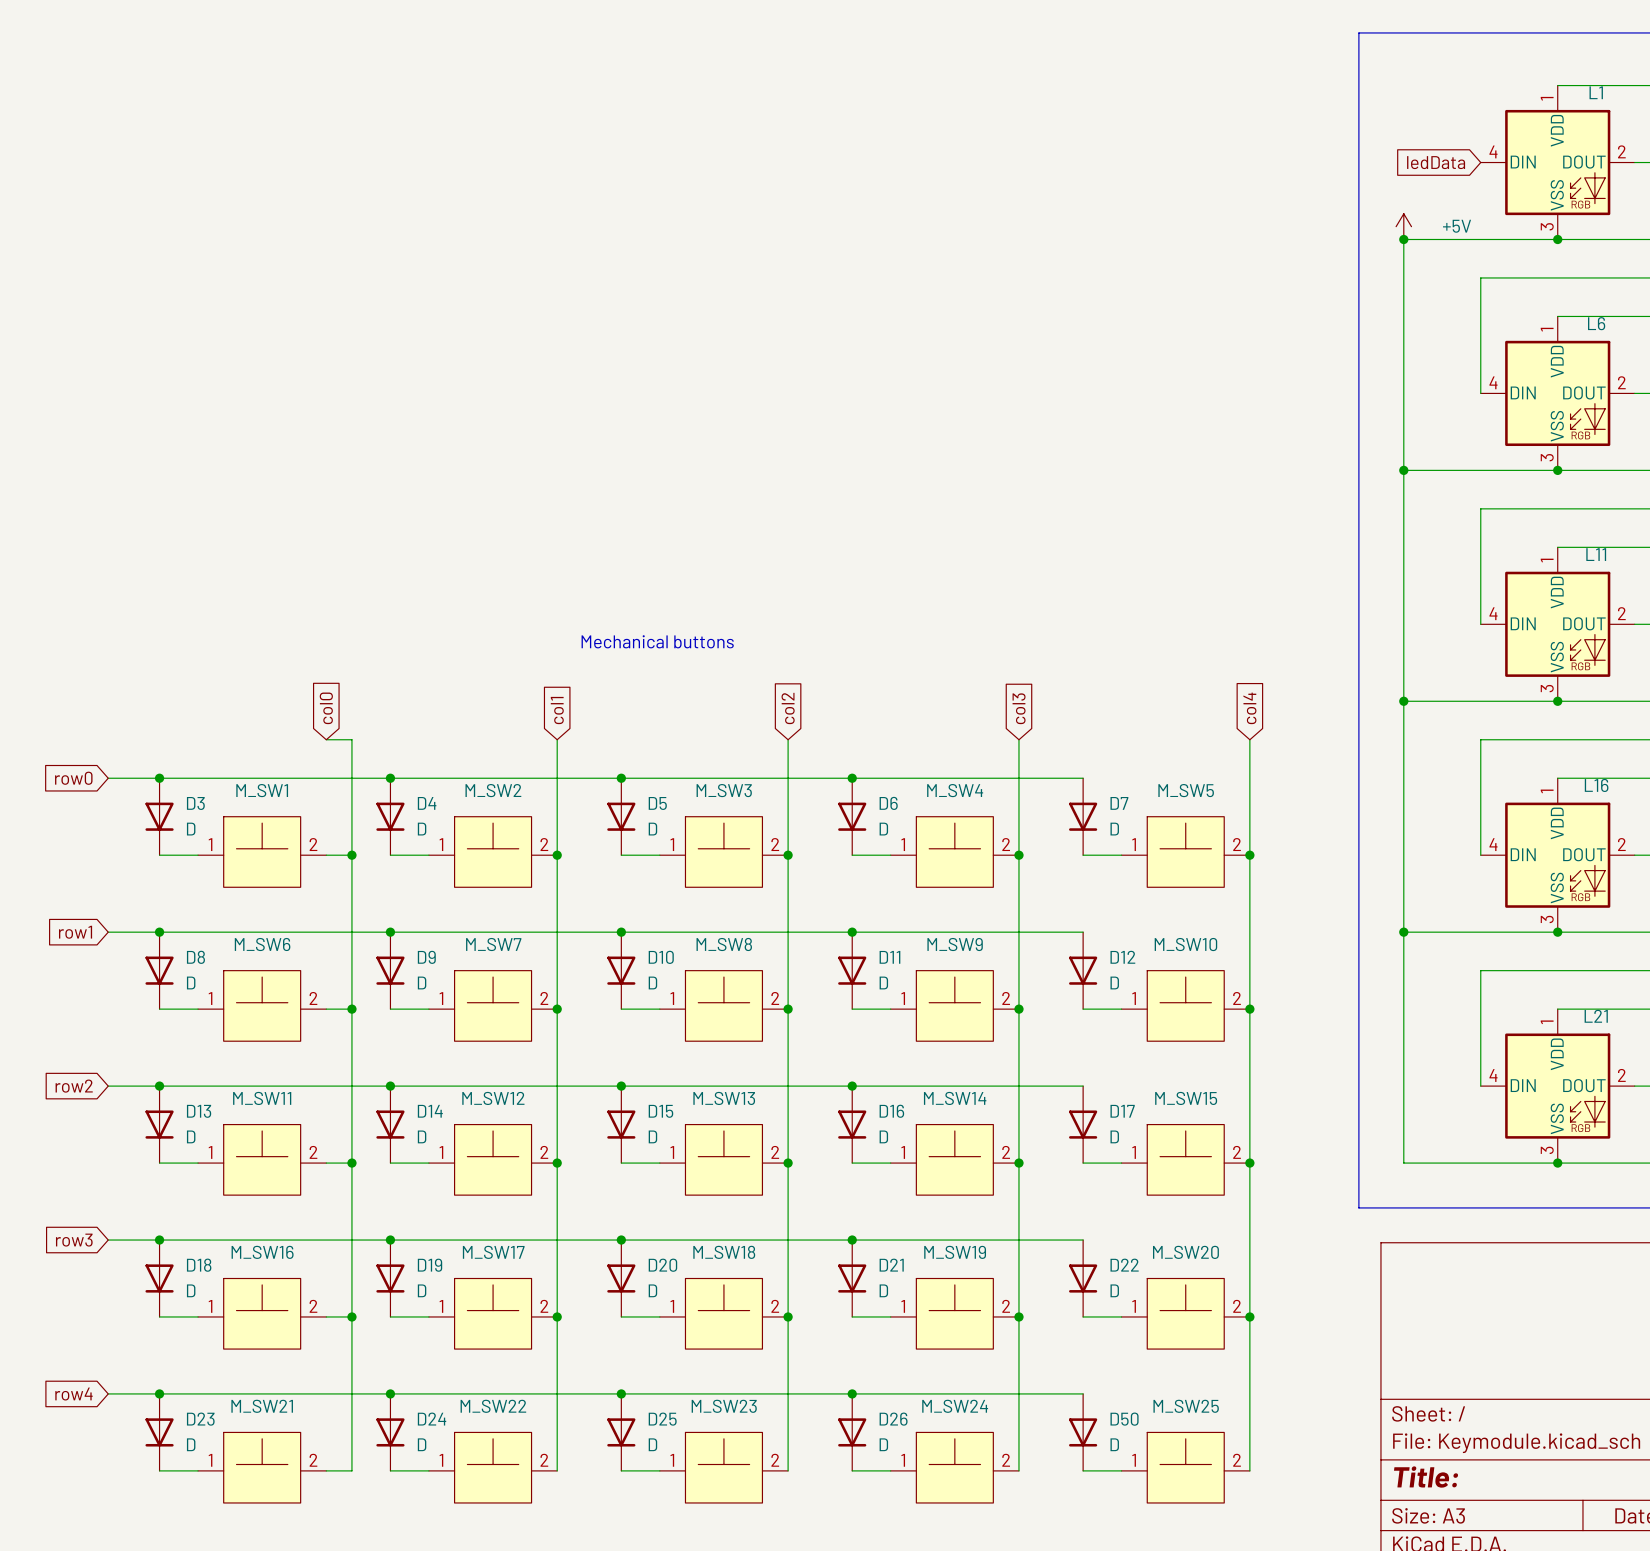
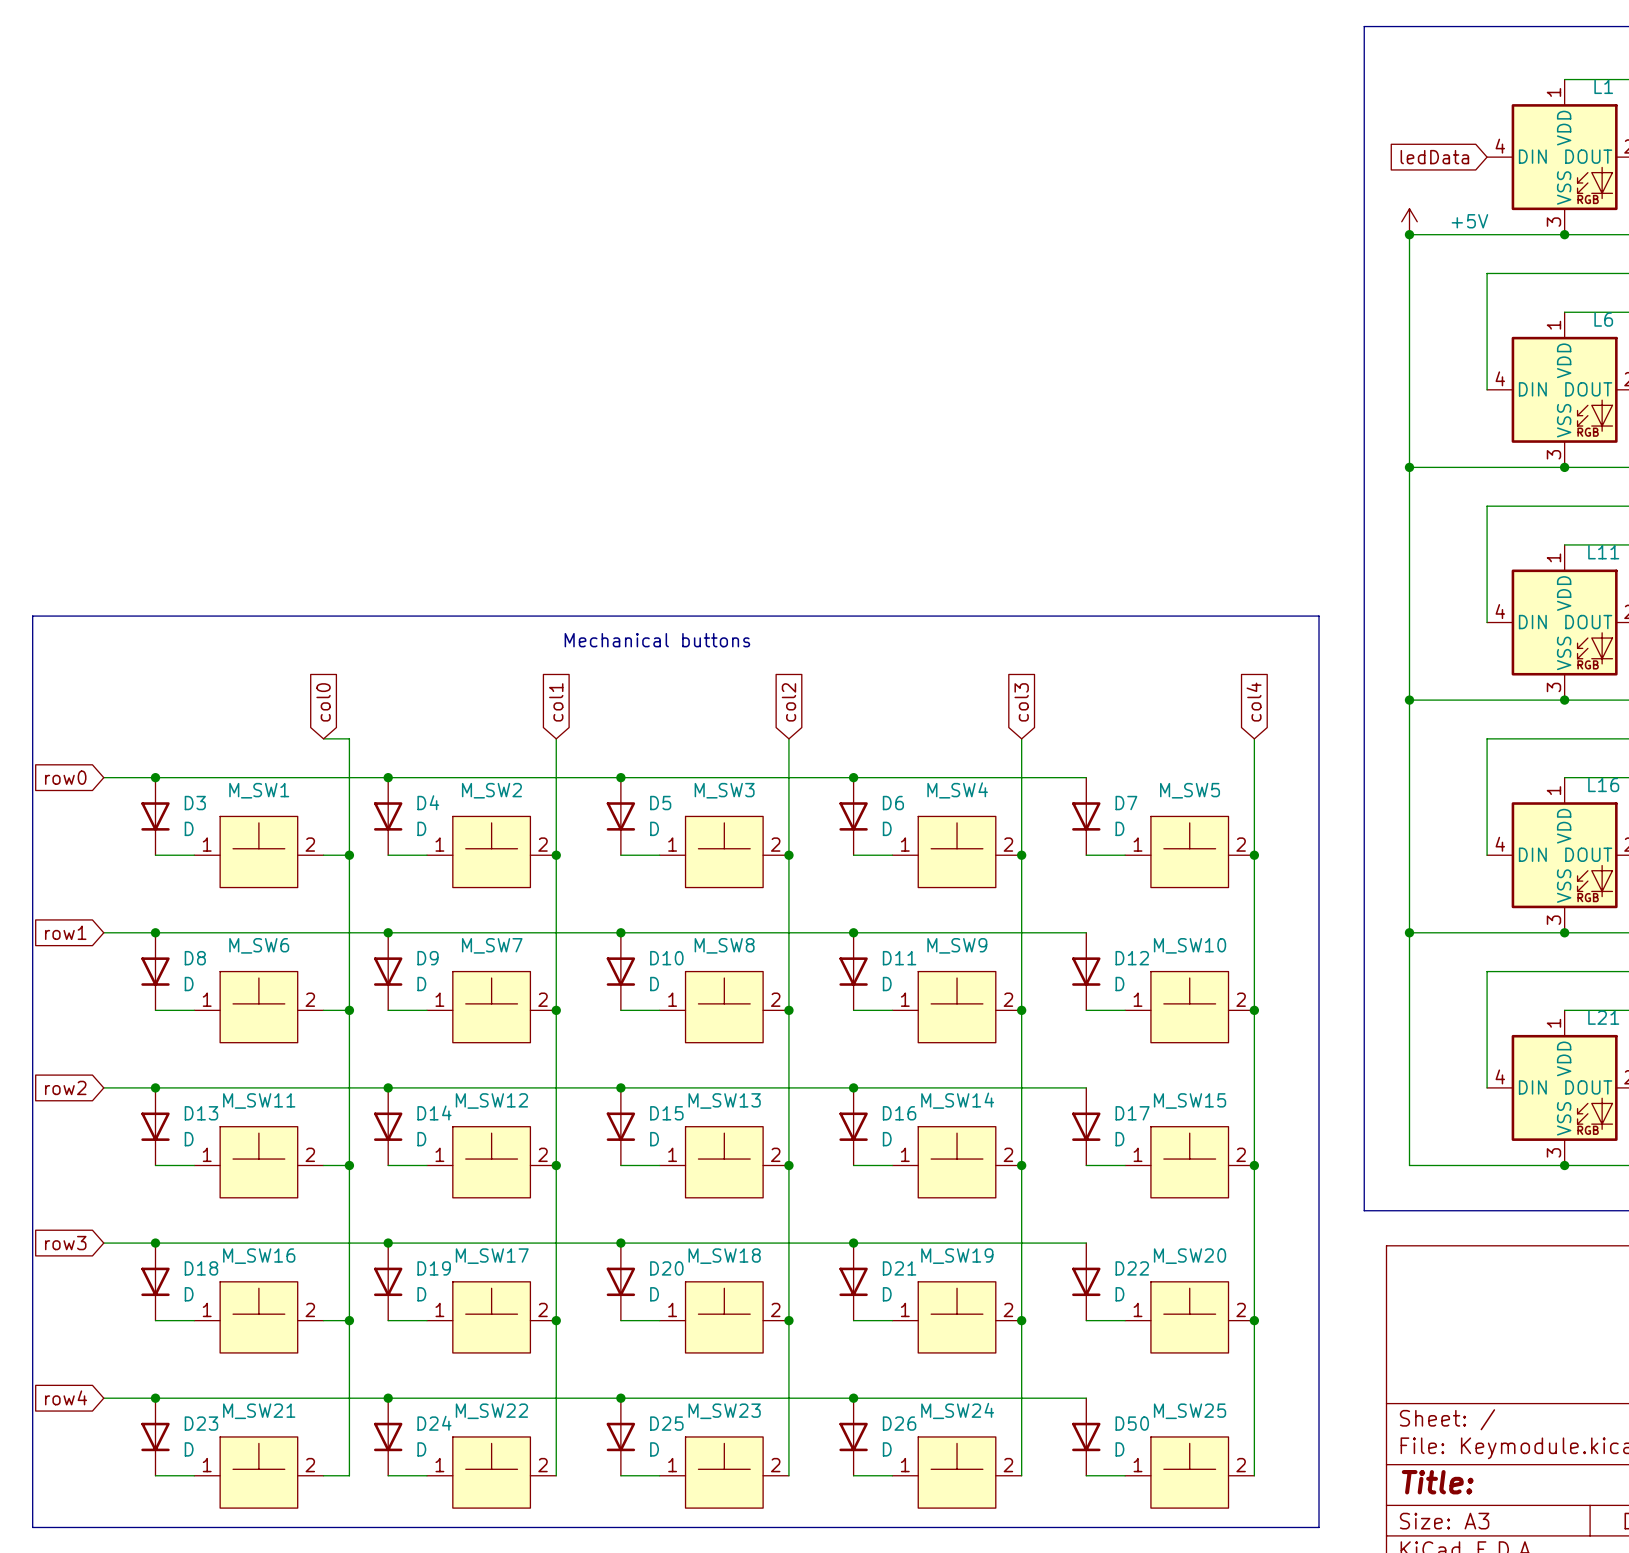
line: none -> (32, 616) (1319, 616) (1319, 1527) (32, 1527) (32, 616)

